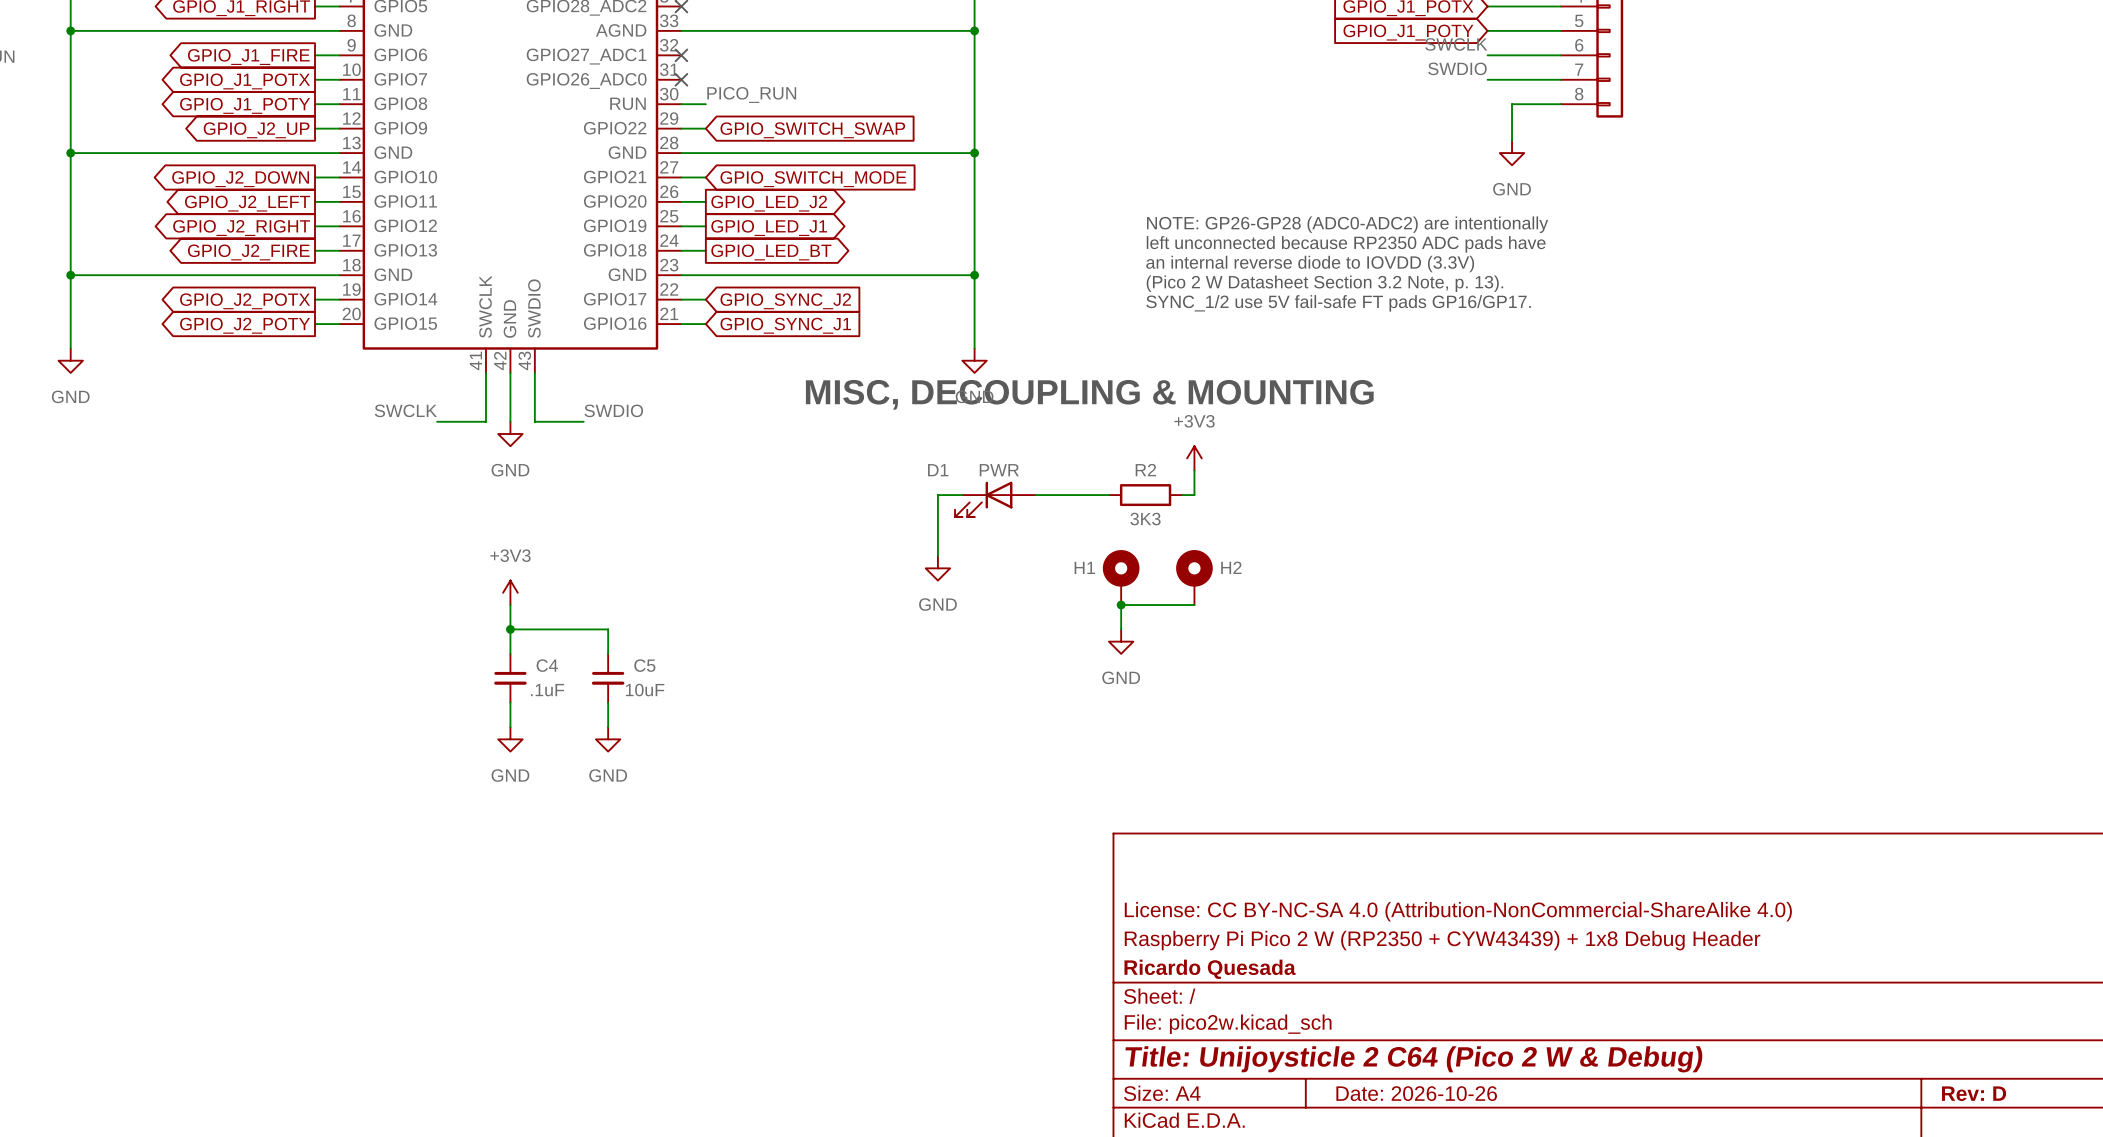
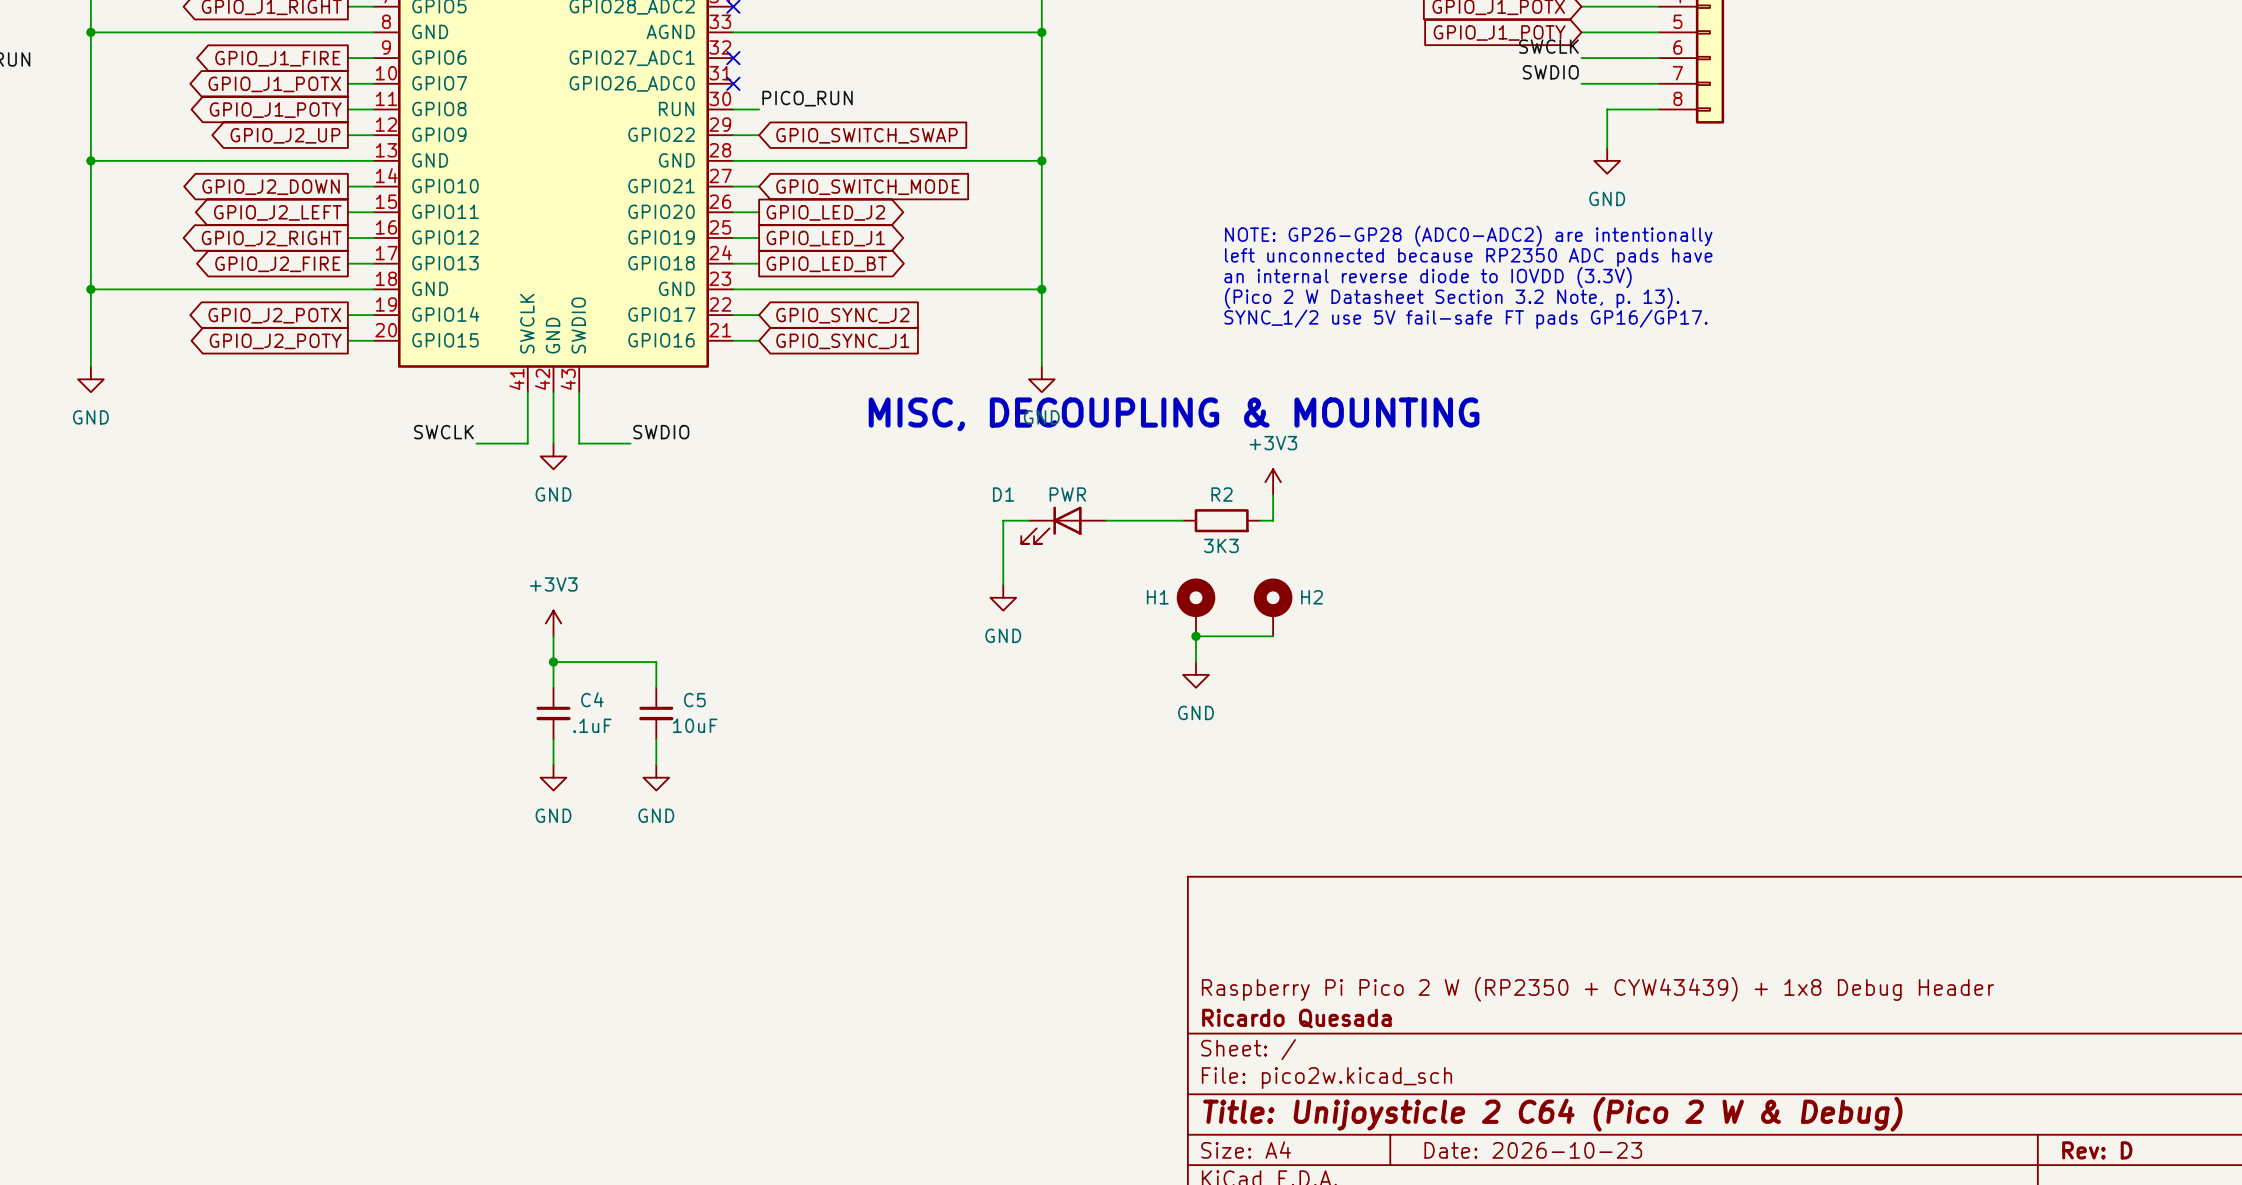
title block: License: CC BY-NC-SA 4.0 (Attribution-NonCommercial-ShareAlike 4.0) (1458, 911) -> none
title block: Date: 2026-10-26 (1416, 1093) -> Date: 2026-10-23 (1533, 1150)

